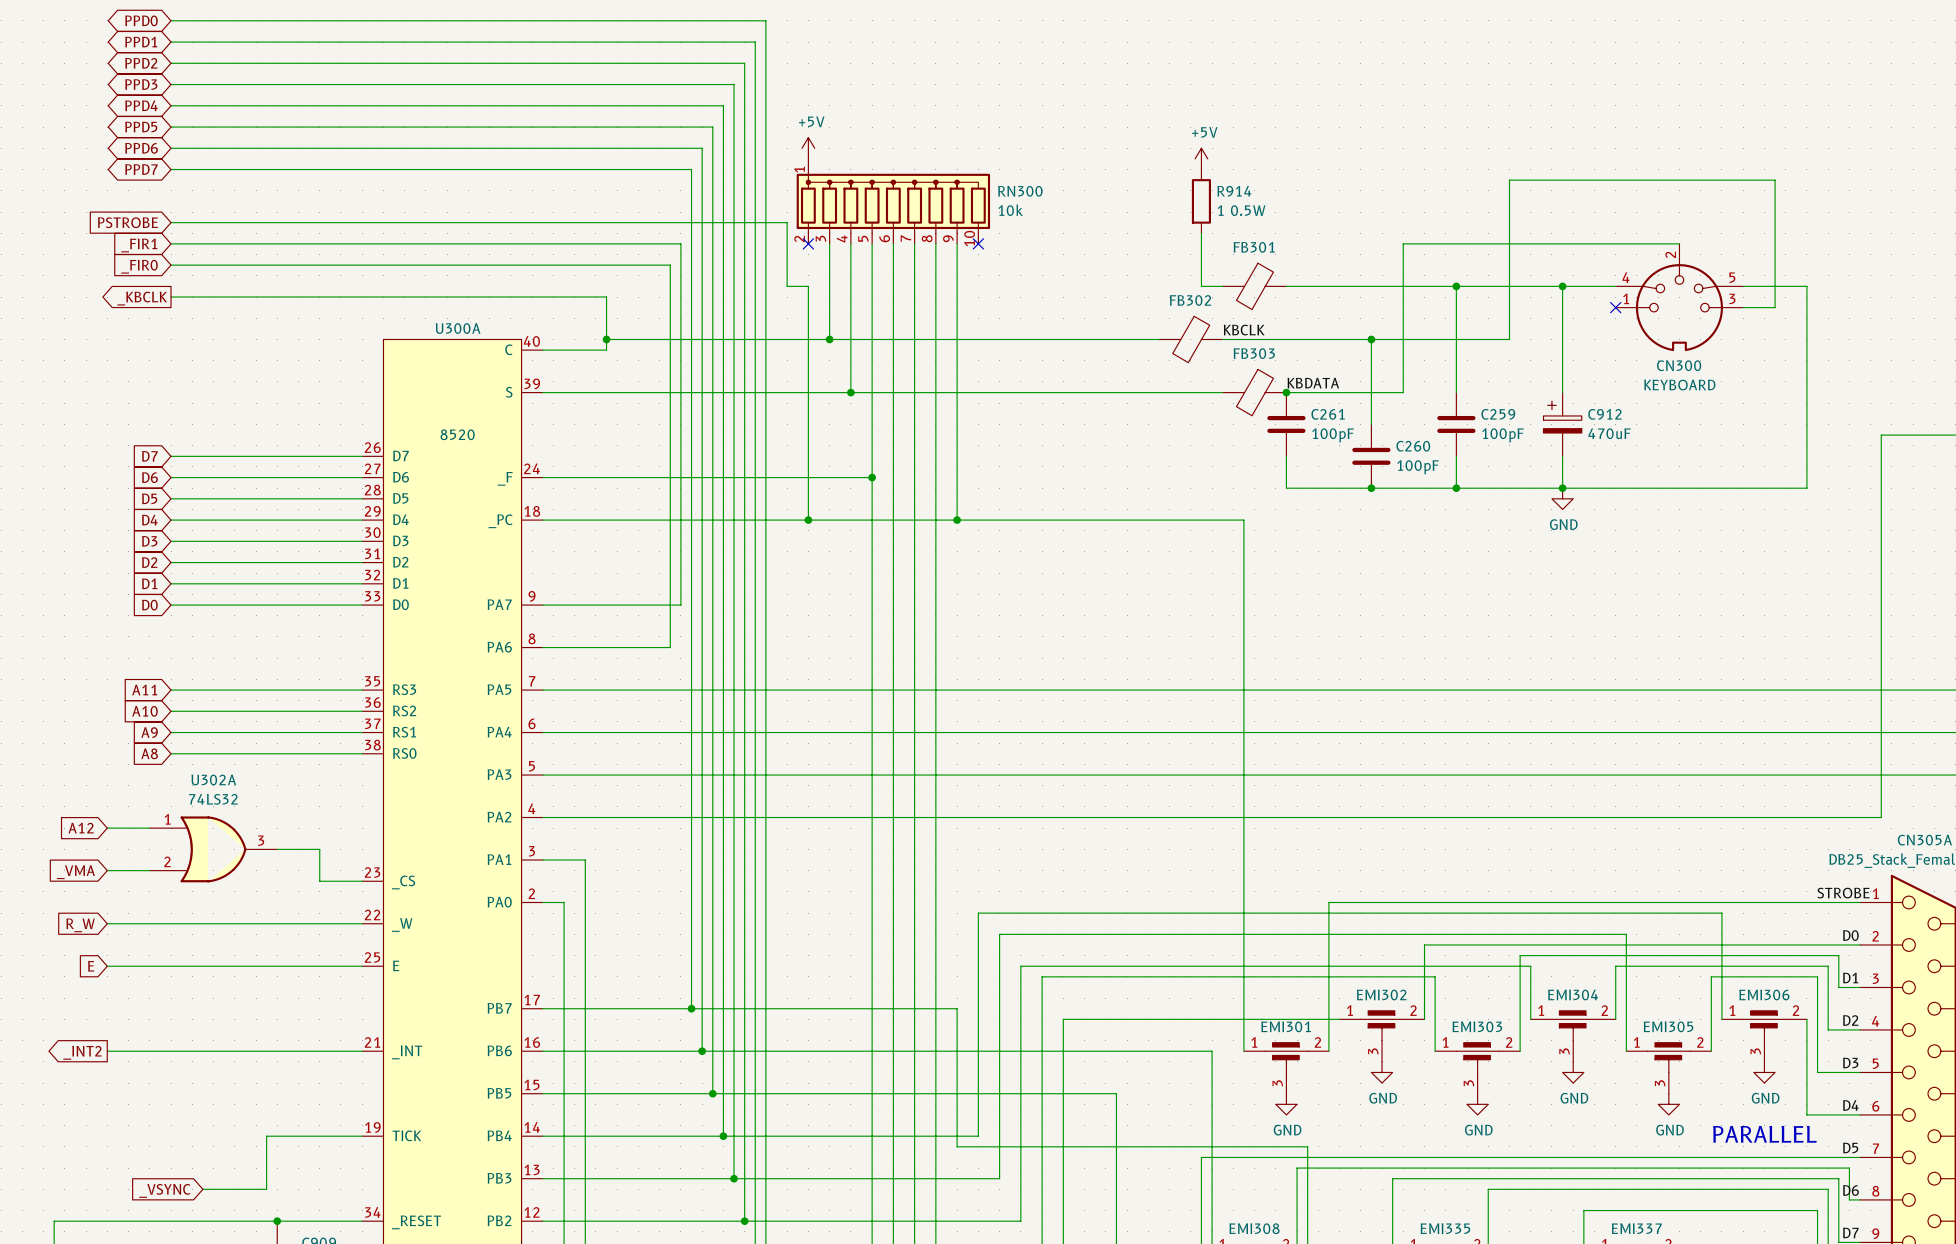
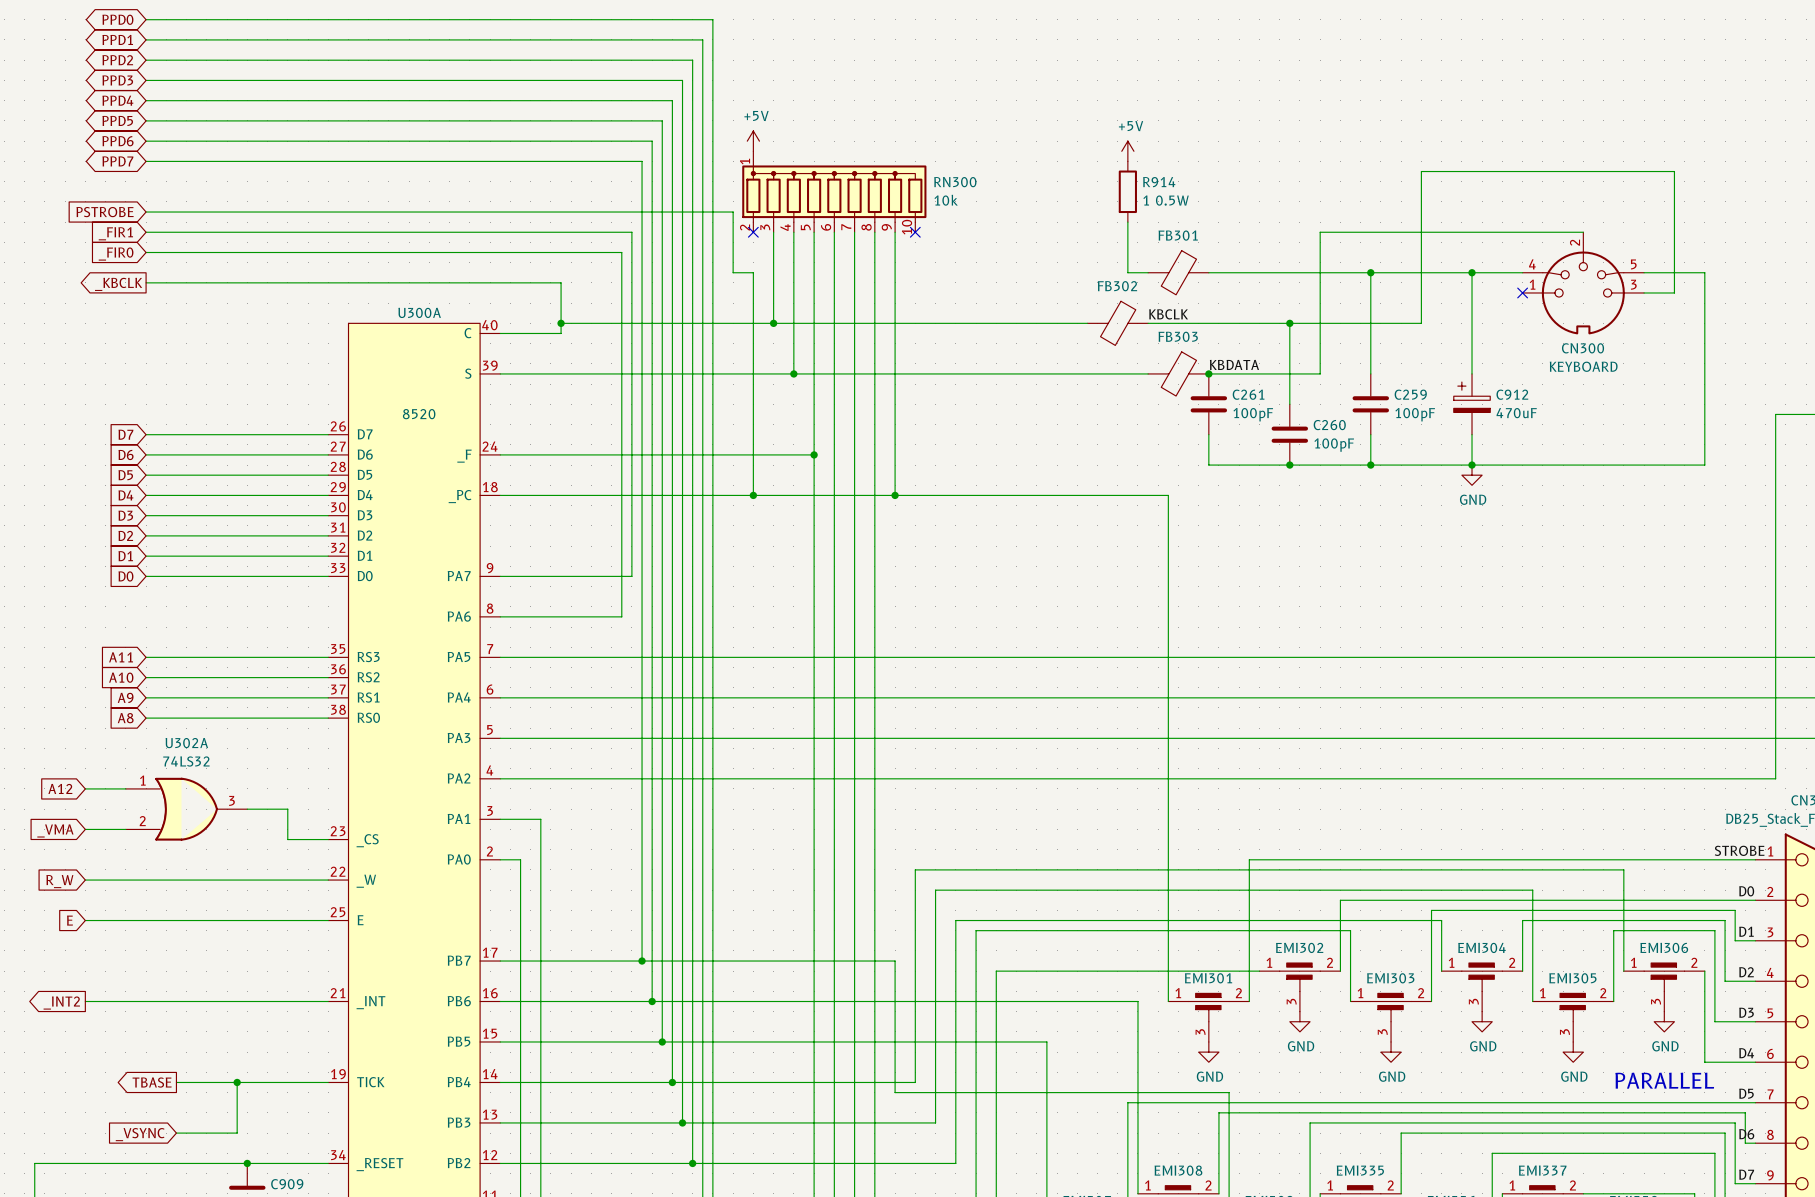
global label: none -> TBASE (152, 1082)
wire: none -> (176, 1082) (237, 1082)
junction: none -> (237, 1082)

